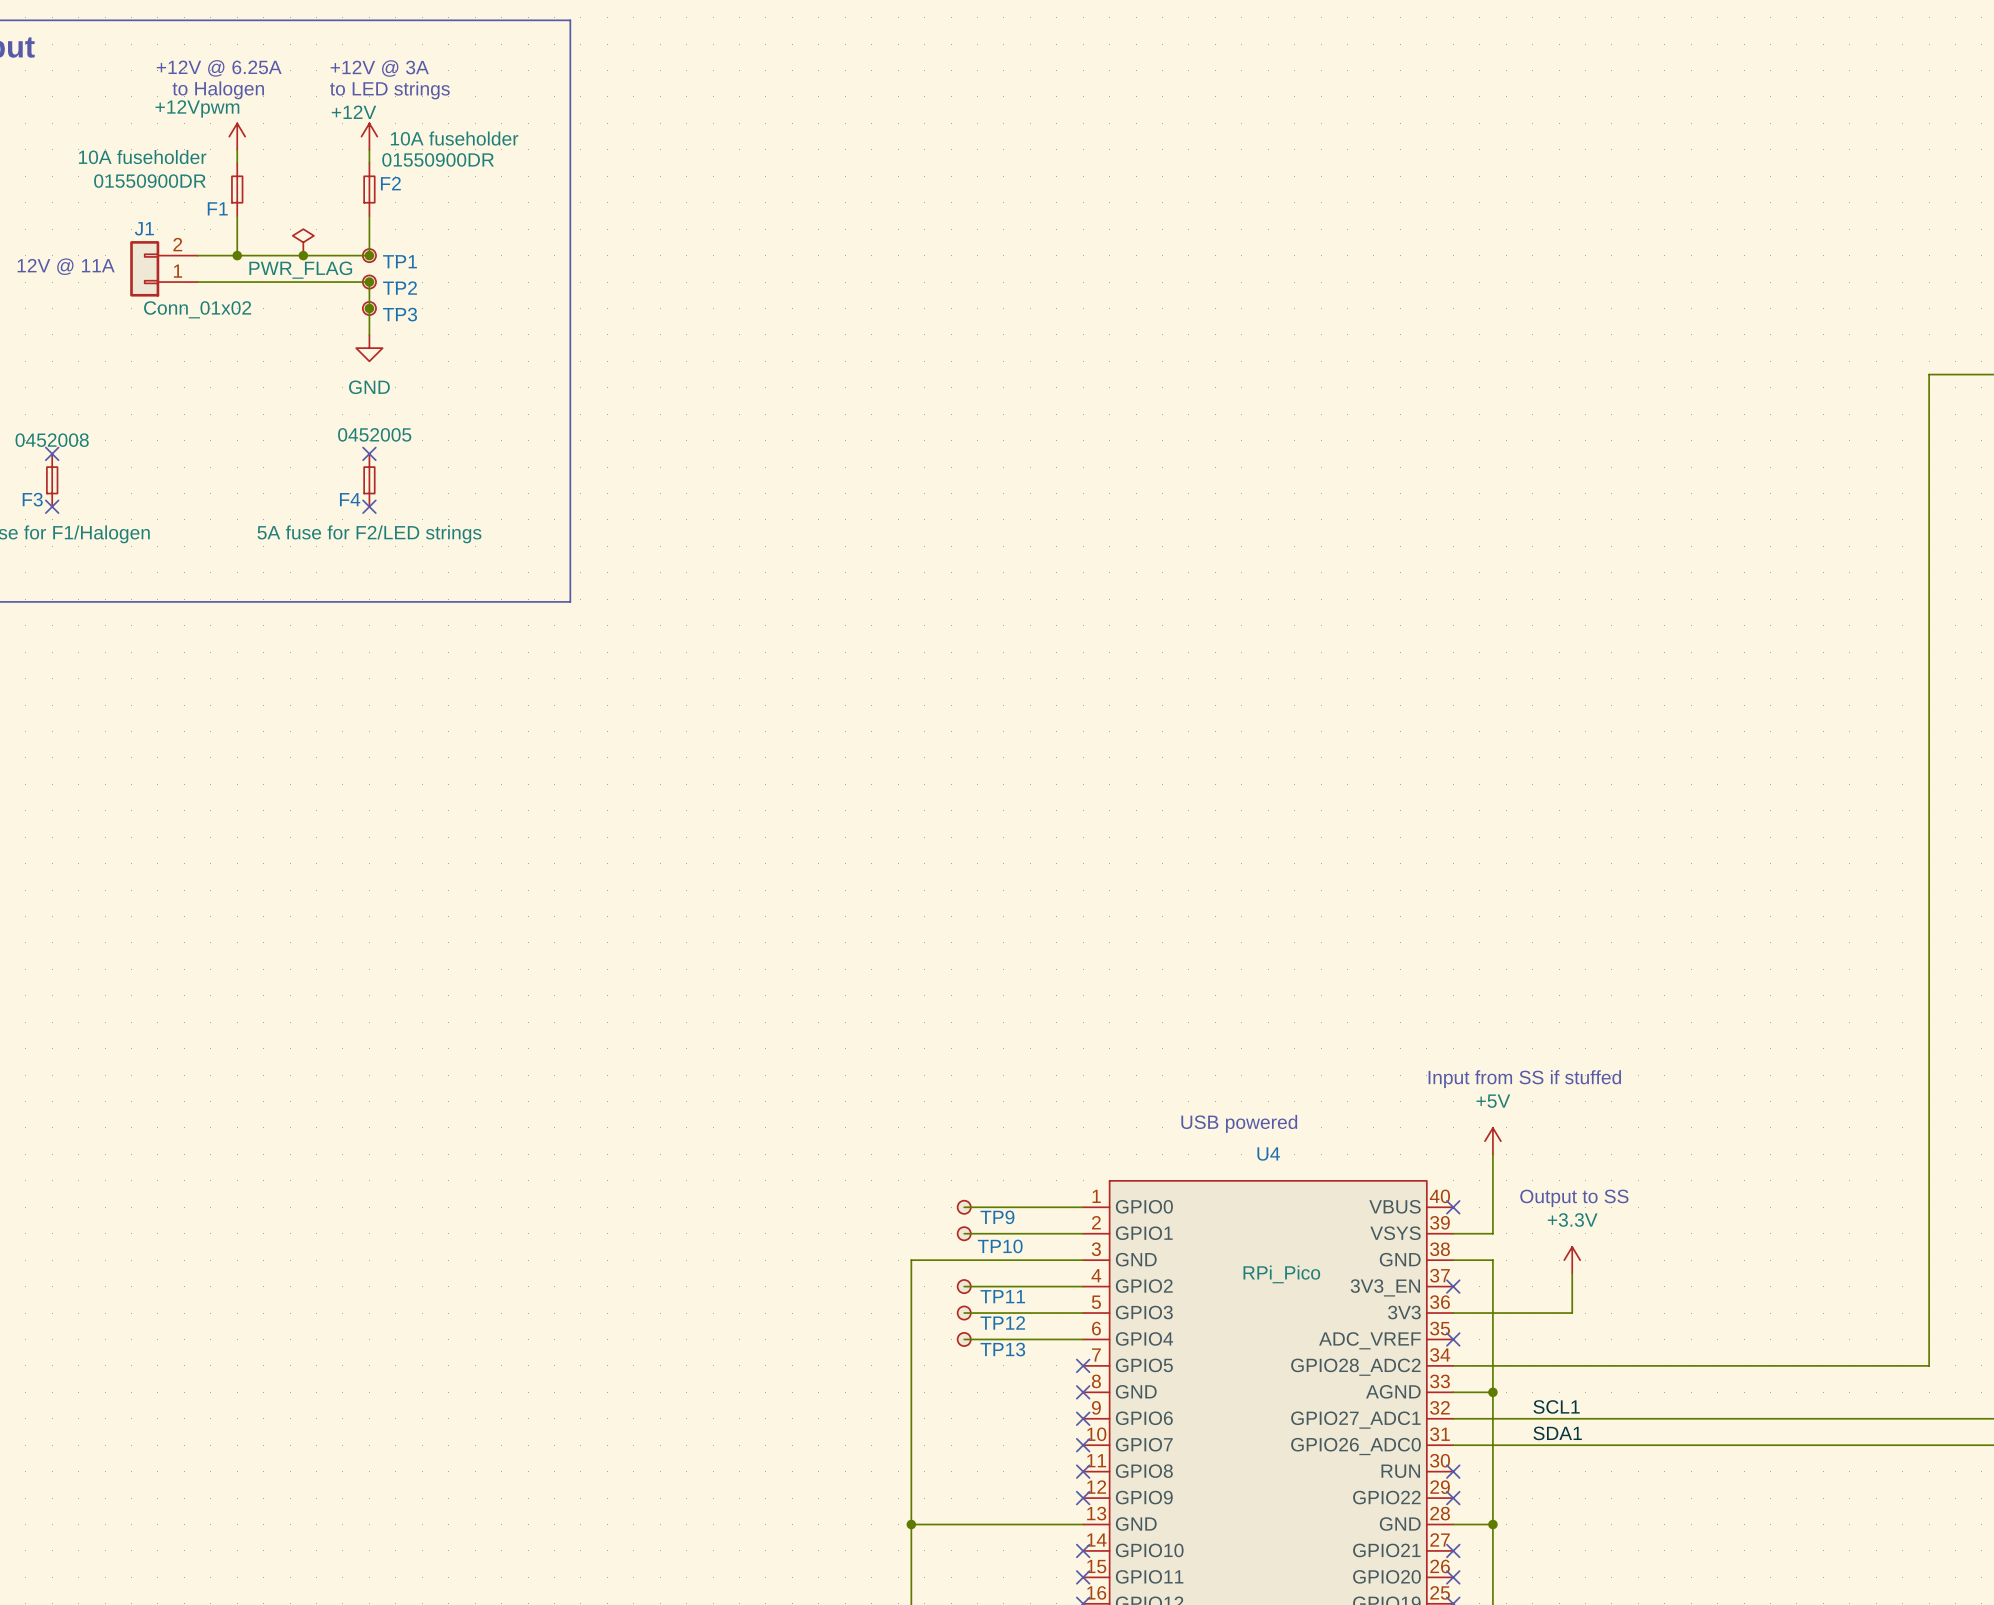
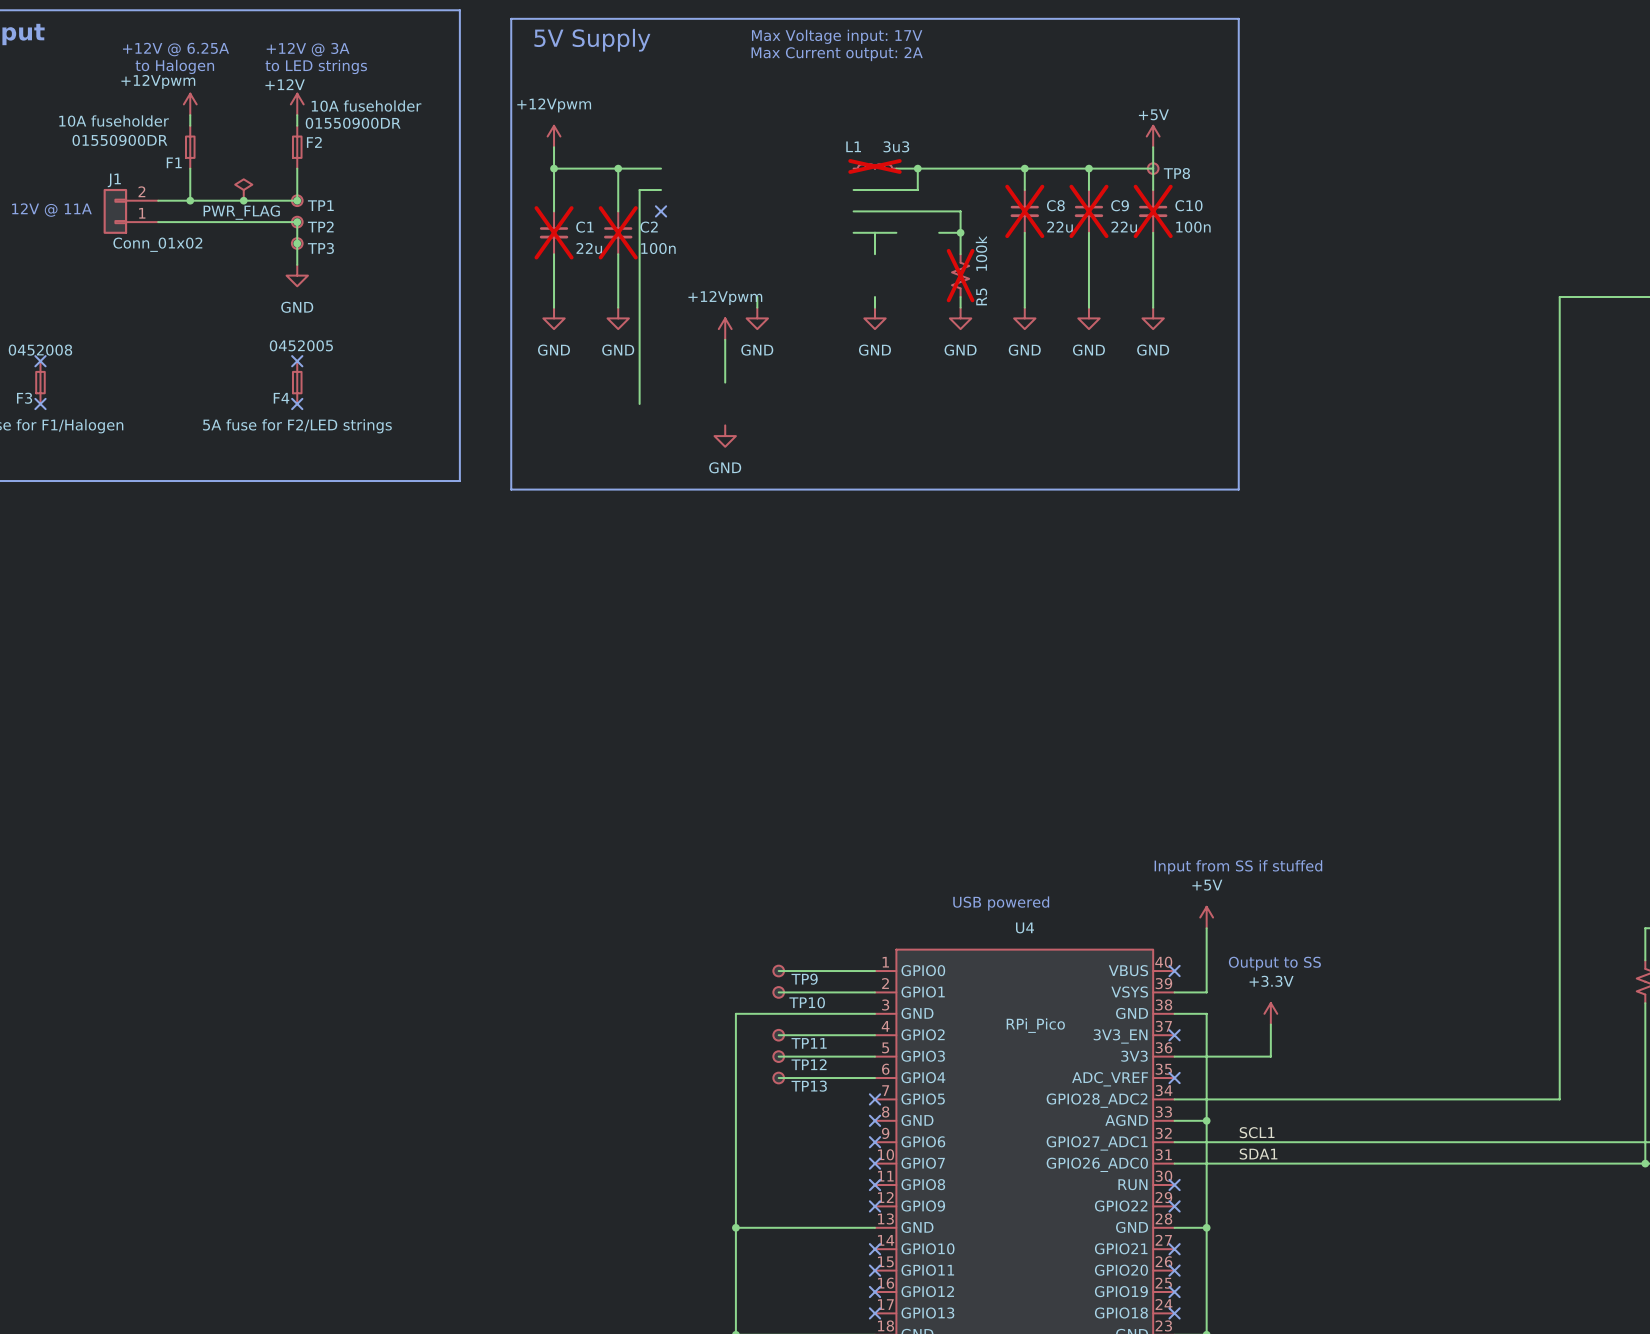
line: none -> (511, 18) (1238, 18) (1238, 489) (511, 489) (511, 18)
text: none -> Max Voltage input: 17V (837, 36)
text: none -> 5V Supply (592, 40)
text: none -> Max Current output: 2A (837, 54)
power symbol: none -> +12Vpwm (554, 136)
power symbol: none -> +5V (1153, 136)
wire: none -> (554, 147) (554, 211)
wire: none -> (1153, 147) (1153, 190)
L1: none -> 3u3 (875, 166)
wire: none -> (554, 168) (661, 168)
junction: none -> (554, 168)
wire: none -> (618, 168) (618, 211)
junction: none -> (618, 168)
wire: none -> (896, 168) (1153, 168)
wire: none -> (917, 168) (917, 190) (853, 190)
junction: none -> (917, 168)
wire: none -> (1024, 168) (1024, 190)
junction: none -> (1024, 168)
wire: none -> (1088, 168) (1088, 190)
junction: none -> (1088, 168)
TP8: none -> (1153, 168)
wire: none -> (661, 190) (639, 190) (639, 403)
no-connect mark: none -> (661, 211)
wire: none -> (853, 211) (960, 211) (960, 254)
C8: none -> 22u (1024, 211)
C9: none -> 22u (1088, 211)
C10: none -> 100n (1153, 211)
C1: none -> 22u (554, 232)
C2: none -> 100n (618, 232)
wire: none -> (853, 232) (896, 232)
wire: none -> (875, 232) (875, 254)
wire: none -> (939, 232) (960, 232)
junction: none -> (960, 232)
wire: none -> (1024, 232) (1024, 307)
wire: none -> (1088, 232) (1088, 307)
wire: none -> (1153, 232) (1153, 307)
wire: none -> (554, 254) (554, 307)
wire: none -> (618, 254) (618, 307)
R5: none -> 100k (960, 275)
wire: none -> (757, 297) (757, 307)
wire: none -> (875, 297) (875, 307)
wire: none -> (960, 297) (960, 307)
power symbol: none -> GND (554, 318)
power symbol: none -> GND (618, 318)
power symbol: none -> GND (757, 318)
power symbol: none -> GND (875, 318)
power symbol: none -> GND (960, 318)
power symbol: none -> GND (1024, 318)
power symbol: none -> GND (1088, 318)
power symbol: none -> GND (1153, 318)
power symbol: none -> +12Vpwm (725, 329)
wire: none -> (725, 339) (725, 382)
power symbol: none -> GND (725, 436)

